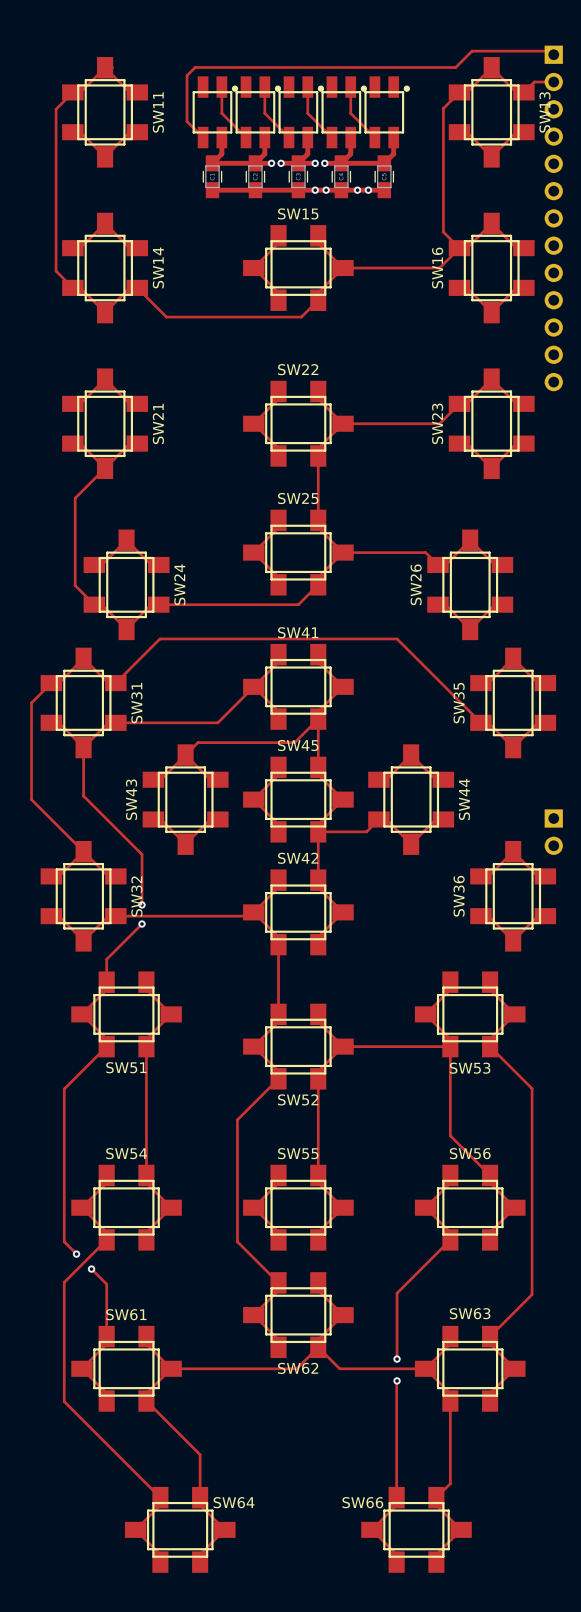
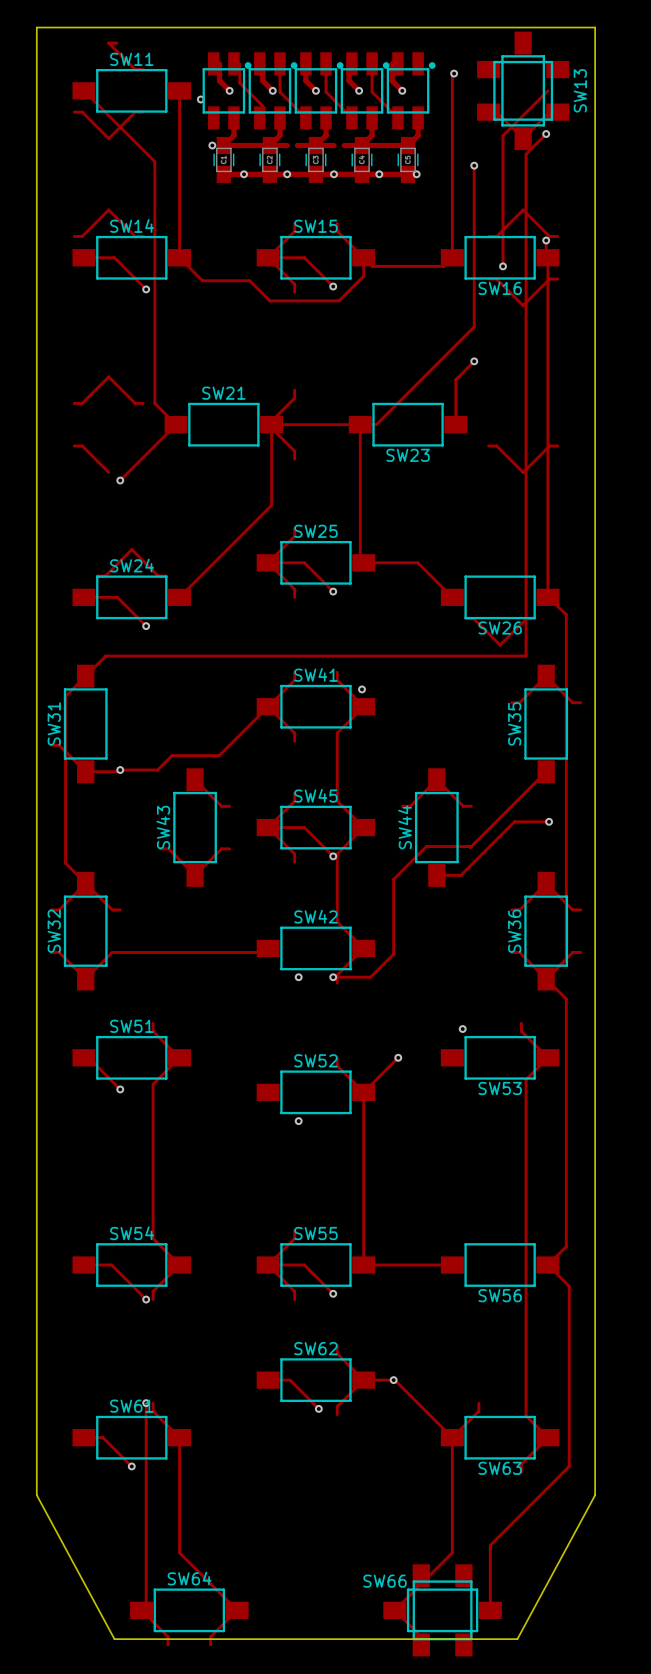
board edge: none -> (36, 27) (36, 1495) (114, 1639) (517, 1639) (595, 1495) (595, 27) (36, 27)
track: (553, 54) (550, 51) (472, 51) (455, 67) (195, 67) (187, 75) (187, 121) (203, 137) -> none
SW11 footprint: [62, 57, 149, 168] -> [72, 68, 192, 113]
track: (105, 67) (80, 92) (72, 92) (56, 109) (56, 271) (72, 287) (80, 287) (105, 312) (129, 287) (137, 287) (166, 317) (301, 317) (318, 300) (318, 292) (342, 268) (439, 268) (459, 248) (443, 232) (443, 108) (459, 92) (466, 92) (491, 67) (516, 92) (523, 92) (534, 82) (553, 82) -> none
track: none -> (219, 63) (219, 80) (229, 90)
track: (221, 87) (221, 113) (246, 137) -> none
track: none -> (239, 63) (239, 83) (262, 106) (262, 117)
track: none -> (262, 63) (262, 80) (272, 90)
track: none -> (305, 63) (305, 80) (315, 90)
track: none -> (349, 63) (349, 80) (359, 90)
track: none -> (392, 63) (392, 80) (402, 90)
track: none -> (454, 73) (452, 75) (452, 257) (443, 266) (372, 266) (363, 257) (363, 276) (338, 300) (269, 300) (249, 280) (202, 280) (179, 257) (179, 90)
via: none -> (454, 73)
track: none -> (84, 90) (154, 161) (154, 403) (176, 424)
SW11 name position: SW11 (158, 112) -> SW11 (131, 59)
via: none -> (229, 90)
via: none -> (272, 90)
via: none -> (315, 90)
via: none -> (359, 90)
via: none -> (402, 90)
track: none -> (547, 90) (503, 135) (503, 266)
via: none -> (200, 99)
via: none -> (546, 134)
via: none -> (212, 145)
via: (271, 163) -> none
via: (281, 163) -> none
via: (315, 163) -> none
via: (324, 163) -> none
via: none -> (474, 165)
via: none -> (244, 174)
via: none -> (287, 174)
via: (326, 190) -> none
via position: (368, 190) -> (416, 174)
SW14 footprint: [62, 212, 149, 324] -> [72, 235, 192, 280]
SW16 footprint: [448, 212, 535, 324] -> [440, 235, 560, 280]
SW15 name position: SW15 (298, 213) -> SW15 (315, 226)
part: (553, 218) -> none
SW15 footprint: [243, 225, 354, 311] -> [256, 235, 376, 280]
track: none -> (546, 240) (546, 256) (547, 257) (547, 597) (566, 614) (566, 959) (546, 978) (566, 999) (566, 1246) (547, 1265) (569, 1286) (569, 1466) (490, 1545) (490, 1610)
via: none -> (546, 240)
SW14 name position: SW14 (158, 267) -> SW14 (132, 225)
track: none -> (84, 257) (114, 257) (146, 289)
track: none -> (268, 257) (304, 257) (333, 286)
SW16 name position: SW16 (437, 268) -> SW16 (500, 288)
via: none -> (503, 266)
via: none -> (333, 286)
via: none -> (146, 289)
track: none -> (474, 361) (455, 379) (455, 424) (456, 423)
via: none -> (474, 361)
SW21 footprint: [62, 368, 149, 480] -> [164, 402, 284, 447]
SW23 footprint: [448, 368, 535, 480] -> [348, 402, 468, 447]
track: (318, 391) (318, 399) (342, 423) (318, 448) (318, 527) (339, 549) -> (360, 424) (360, 559)
track: (523, 403) (516, 403) (491, 379) (466, 403) (459, 403) (439, 423) (354, 423) -> (474, 165) (474, 326) (376, 424)
SW21 name position: SW21 (158, 423) -> SW21 (223, 393)
track: none -> (176, 424) (120, 480)
SW22: (298, 423) -> none
track: none -> (363, 424) (271, 424) (271, 505) (179, 597)
SW23 name position: SW23 (437, 423) -> SW23 (408, 455)
track: (137, 443) (129, 443) (75, 498) (75, 585) (94, 604) (101, 604) (126, 629) (151, 604) (298, 604) (318, 584) (318, 577) (342, 552) -> none
via: none -> (120, 480)
SW25 name position: SW25 (298, 498) -> SW25 (315, 531)
SW25 footprint: [243, 509, 354, 596] -> [256, 540, 376, 585]
SW24 footprint: [83, 529, 170, 641] -> [72, 575, 192, 620]
SW26 footprint: [427, 529, 514, 641] -> [440, 575, 560, 620]
track: none -> (268, 562) (304, 562) (333, 591)
track: (393, 552) (425, 552) (438, 564) (445, 564) (470, 540) (494, 564) (502, 564) -> (417, 562) (452, 597)
via: none -> (333, 591)
track: none -> (84, 597) (117, 597) (146, 626)
SW24 name position: SW24 (179, 584) -> SW24 (132, 565)
SW26 name position: SW26 (416, 584) -> SW26 (500, 627)
via: none -> (146, 626)
SW41 name position: SW41 (298, 632) -> SW41 (315, 674)
SW41 footprint: [243, 643, 354, 730] -> [256, 684, 376, 729]
SW31 footprint: [40, 647, 127, 759] -> [63, 664, 108, 784]
SW35 footprint: [470, 647, 557, 759] -> [524, 664, 569, 784]
track: (83, 658) (108, 683) (115, 683) (159, 638) (397, 638) (480, 722) (488, 722) (513, 747) (537, 722) (545, 722) -> (85, 676) (105, 656) (526, 656) (526, 154) (546, 134)
via: none -> (362, 689)
track: (64, 677) (58, 683) (51, 683) (31, 702) (31, 799) (64, 832) -> (65, 696) (65, 863)
SW31 name position: SW31 (136, 703) -> SW31 (54, 723)
SW35 name position: SW35 (459, 703) -> SW35 (514, 723)
track: (318, 719) (294, 742) (198, 742) (160, 779) (153, 779) -> none
track: (217, 722) (108, 722) (83, 747) (83, 796) (142, 854) (142, 904) -> (229, 745) (219, 755) (172, 755) (157, 770) (85, 771)
SW43 footprint: [142, 744, 229, 855] -> [173, 768, 217, 887]
SW44 footprint: [368, 744, 455, 855] -> [414, 768, 459, 887]
via: none -> (120, 770)
SW45 name position: SW45 (298, 745) -> SW45 (315, 795)
track: none -> (546, 771) (470, 847)
SW45 footprint: [243, 756, 354, 843] -> [256, 805, 376, 850]
track: none -> (549, 821) (514, 821) (461, 875) (436, 875)
via: none -> (549, 821)
SW43 name position: SW43 (131, 799) -> SW43 (163, 827)
track: none -> (268, 827) (304, 827) (333, 856)
SW44 name position: SW44 (464, 799) -> SW44 (405, 827)
track: none -> (471, 846) (426, 846) (393, 879) (393, 954) (370, 977) (333, 977)
track: (443, 819) (435, 819) (411, 844) (386, 819) (378, 819) (366, 831) (318, 831) -> none
via: none -> (333, 856)
part: (553, 832) -> none
SW32 footprint: [40, 840, 127, 952] -> [63, 871, 108, 991]
SW36 footprint: [470, 840, 557, 952] -> [524, 871, 569, 991]
SW42 name position: SW42 (298, 858) -> SW42 (315, 916)
SW42 footprint: [243, 869, 354, 956] -> [256, 926, 376, 971]
track: (278, 880) (278, 887) (253, 912) (278, 937) (278, 1021) (253, 1046) (278, 1071) (278, 1078) (237, 1119) (237, 1241) (278, 1282) (278, 1290) (253, 1315) (278, 1339) (278, 1347) -> none
SW32 name position: SW32 (136, 896) -> SW32 (54, 931)
SW36 name position: SW36 (459, 896) -> SW36 (514, 931)
via: (142, 904) -> none
track: (142, 924) (106, 959) (106, 989) (81, 1014) (106, 1039) (106, 1046) (64, 1089) (64, 1241) (76, 1254) -> none
via: (142, 924) -> none
via: none -> (298, 977)
via: none -> (333, 977)
SW51 footprint: [71, 971, 182, 1058] -> [72, 1035, 192, 1080]
SW53 footprint: [414, 971, 526, 1058] -> [440, 1035, 560, 1080]
track: (450, 982) (450, 989) (425, 1014) (450, 1039) (450, 1135) (490, 1175) (490, 1183) (514, 1207) (490, 1232) (490, 1239) -> none
via: none -> (462, 1029)
SW52 footprint: [243, 1003, 354, 1090] -> [256, 1070, 376, 1115]
track: none -> (84, 1057) (88, 1057) (120, 1089)
track: none -> (398, 1057) (363, 1092) (363, 1265) (452, 1265)
via: none -> (398, 1057)
track: (494, 1034) (490, 1039) (490, 1046) (532, 1088) (532, 1294) (490, 1336) (490, 1344) (494, 1348) -> (526, 1079) (526, 1415)
via: none -> (120, 1089)
track: (450, 1046) (342, 1046) (318, 1071) (318, 1183) (342, 1207) (318, 1232) (318, 1239) -> none
SW51 name position: SW51 (126, 1067) -> SW51 (131, 1026)
SW53 name position: SW53 (470, 1068) -> SW53 (500, 1088)
via: none -> (298, 1121)
SW52 name position: SW52 (298, 1099) -> SW52 (315, 1060)
SW54 name position: SW54 (126, 1153) -> SW54 (132, 1233)
SW55 name position: SW55 (298, 1153) -> SW55 (315, 1233)
SW56 name position: SW56 (470, 1153) -> SW56 (500, 1295)
SW54 footprint: [71, 1164, 182, 1251] -> [72, 1243, 192, 1287]
SW55 footprint: [243, 1164, 354, 1251] -> [256, 1243, 376, 1287]
SW56 footprint: [414, 1164, 526, 1251] -> [440, 1243, 560, 1287]
track: (106, 1175) (106, 1183) (81, 1207) (106, 1232) (106, 1239) (64, 1282) (64, 1401) (160, 1497) (160, 1505) (139, 1525) -> (146, 1403) (146, 1605)
track: (450, 1175) (450, 1183) (425, 1207) (450, 1232) (450, 1239) (397, 1293) (397, 1359) -> none
track: none -> (84, 1265) (111, 1265) (146, 1299)
track: none -> (268, 1265) (304, 1265) (333, 1293)
via: none -> (333, 1293)
via: none -> (146, 1299)
via: (76, 1254) -> none
track: (91, 1269) (106, 1284) (106, 1344) (81, 1368) (106, 1393) (106, 1401) -> none
via: (91, 1269) -> none
SW62 footprint: [243, 1272, 354, 1359] -> [256, 1358, 376, 1402]
SW63 name position: SW63 (470, 1313) -> SW63 (500, 1468)
SW61 name position: SW61 (126, 1314) -> SW61 (131, 1406)
track: none -> (268, 1380) (290, 1380) (318, 1408)
via: none -> (393, 1380)
SW61 footprint: [71, 1325, 182, 1412] -> [72, 1415, 192, 1460]
SW63 footprint: [414, 1325, 526, 1412] -> [440, 1415, 560, 1460]
via: none -> (146, 1403)
via: none -> (318, 1408)
via: (397, 1359) -> none
track: none -> (84, 1437) (102, 1437) (131, 1466)
SW62 name position: SW62 (298, 1368) -> SW62 (315, 1348)
track: (397, 1380) (396, 1505) -> (363, 1380) (394, 1380) (452, 1437) (452, 1552) (421, 1583)
via: (397, 1380) -> none
via: none -> (131, 1466)
SW64 footprint: [124, 1486, 236, 1573] -> [130, 1588, 249, 1633]
SW64 name position: SW64 (234, 1502) -> SW64 (189, 1578)
track: (200, 1505) (200, 1454) (146, 1401) (146, 1393) (171, 1368) (296, 1368) (318, 1347) (339, 1368) (425, 1368) (450, 1393) (450, 1483) (436, 1497) (436, 1505) (461, 1529) (436, 1554) (436, 1562) -> (210, 1583) (179, 1552) (179, 1437)

